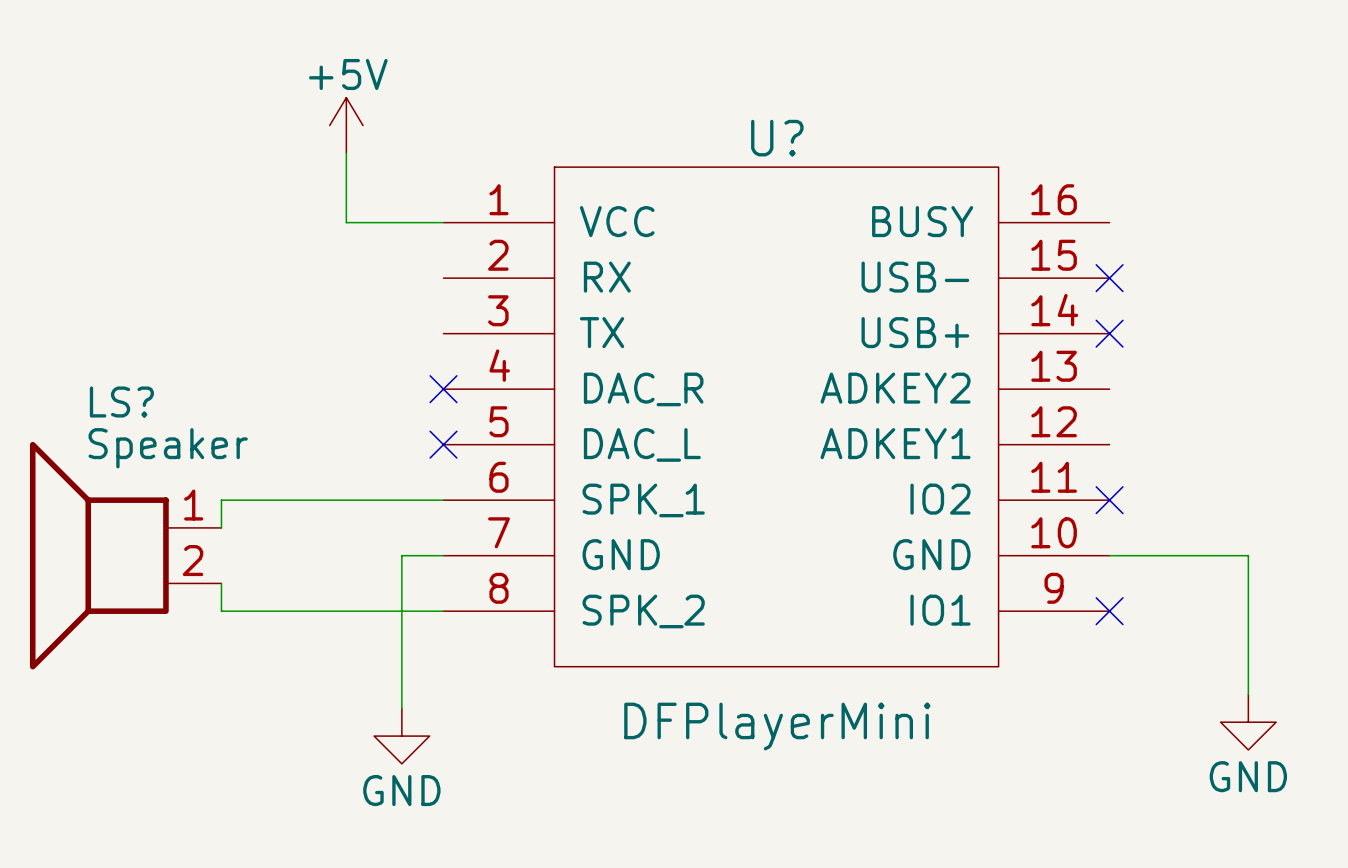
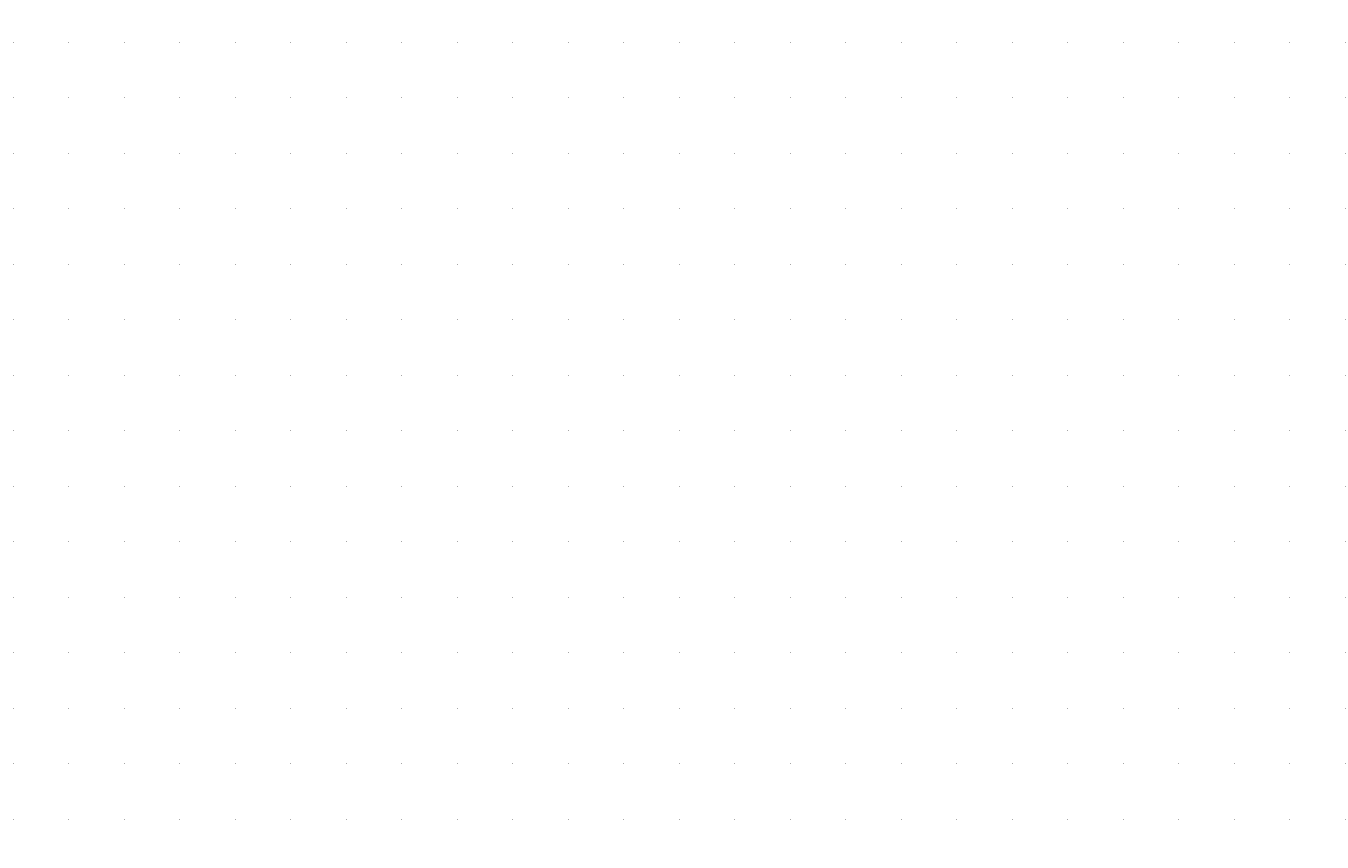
power symbol: +5V (346, 125) -> none
wire: (346, 153) (346, 222) (443, 222) -> none
no-connect mark: (1109, 278) -> none
no-connect mark: (1109, 333) -> none
no-connect mark: (443, 389) -> none
U?: DFPlayerMini (776, 416) -> none
no-connect mark: (443, 444) -> none
wire: (443, 500) (221, 500) (221, 527) -> none
no-connect mark: (1109, 500) -> none
LS?: Speaker (125, 555) -> none
wire: (443, 555) (401, 555) (401, 708) -> none
wire: (1109, 555) (1248, 555) (1248, 694) -> none
wire: (221, 583) (221, 611) (443, 611) -> none
no-connect mark: (1109, 611) -> none
power symbol: GND (1248, 722) -> none
power symbol: GND (401, 736) -> none

